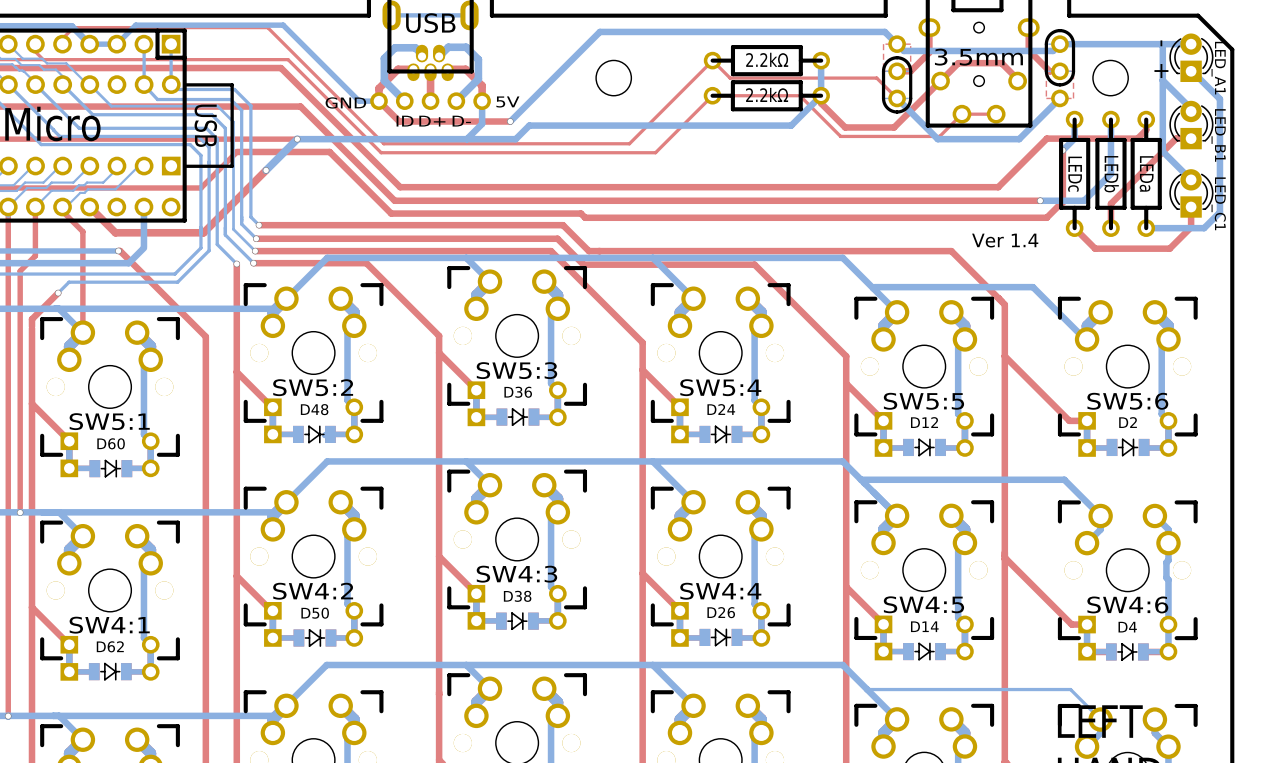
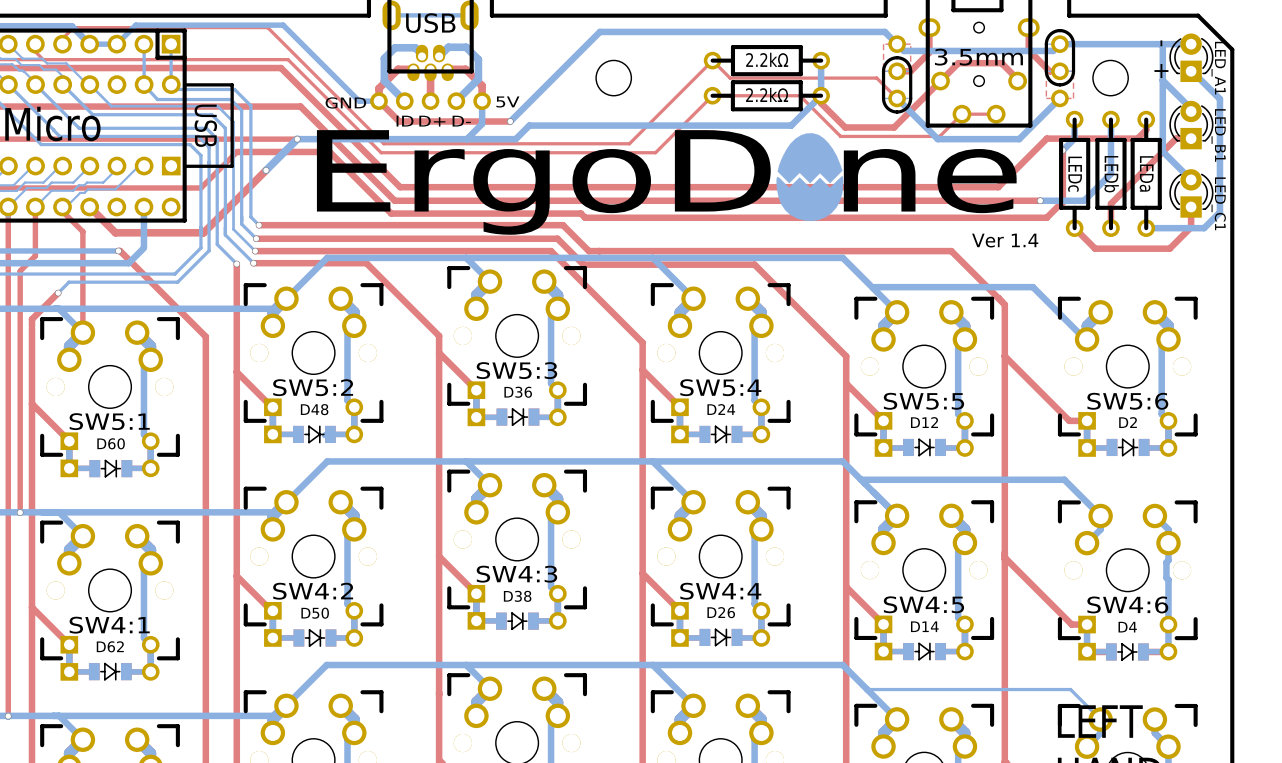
drawing: none -> [776, 133, 844, 222]
text: none -> ErgoD ne (666, 182)

